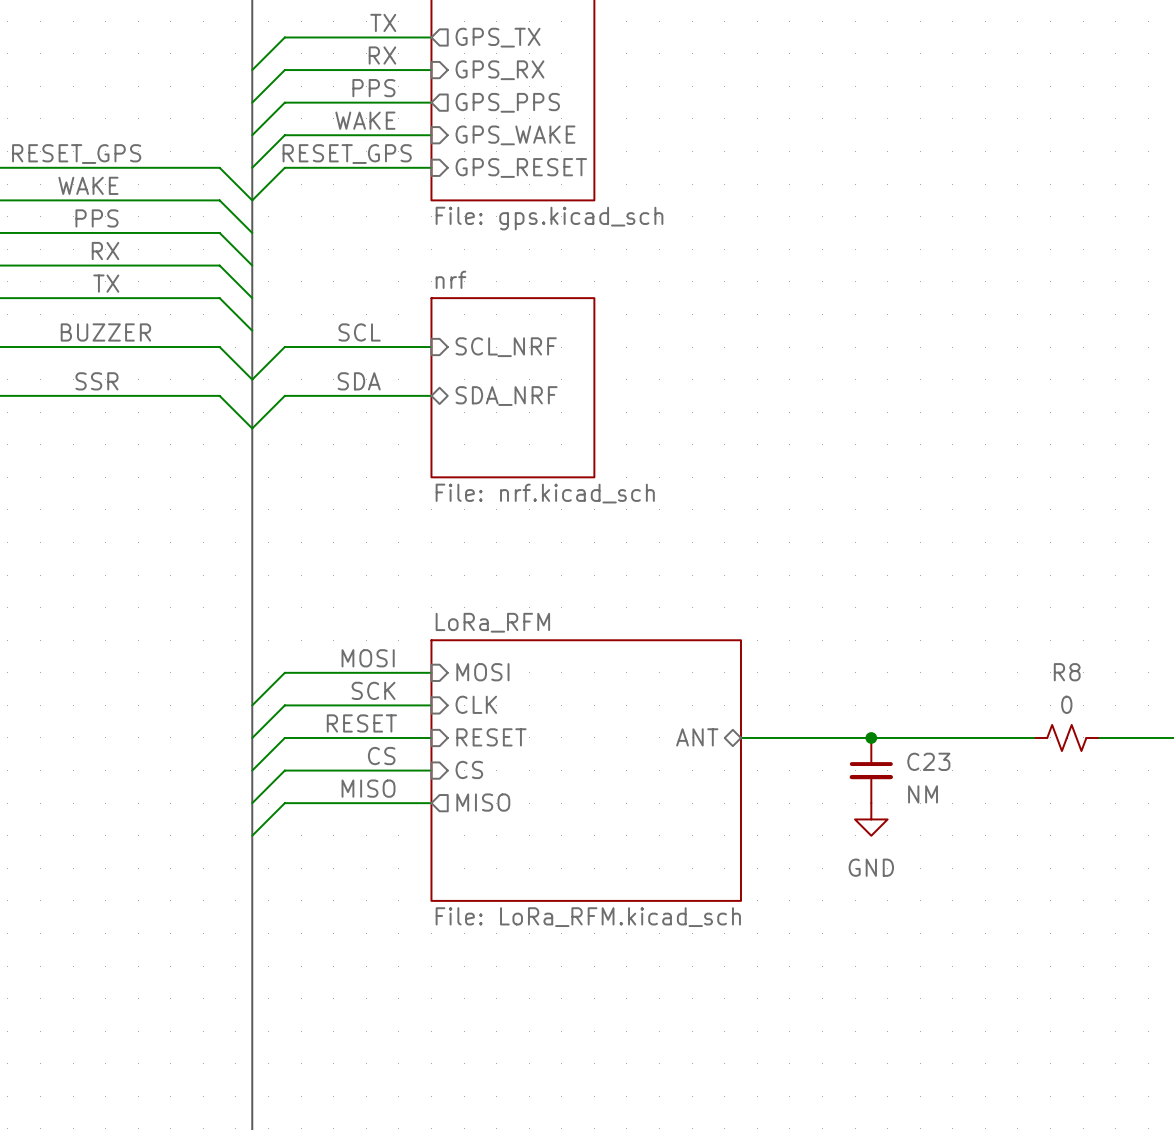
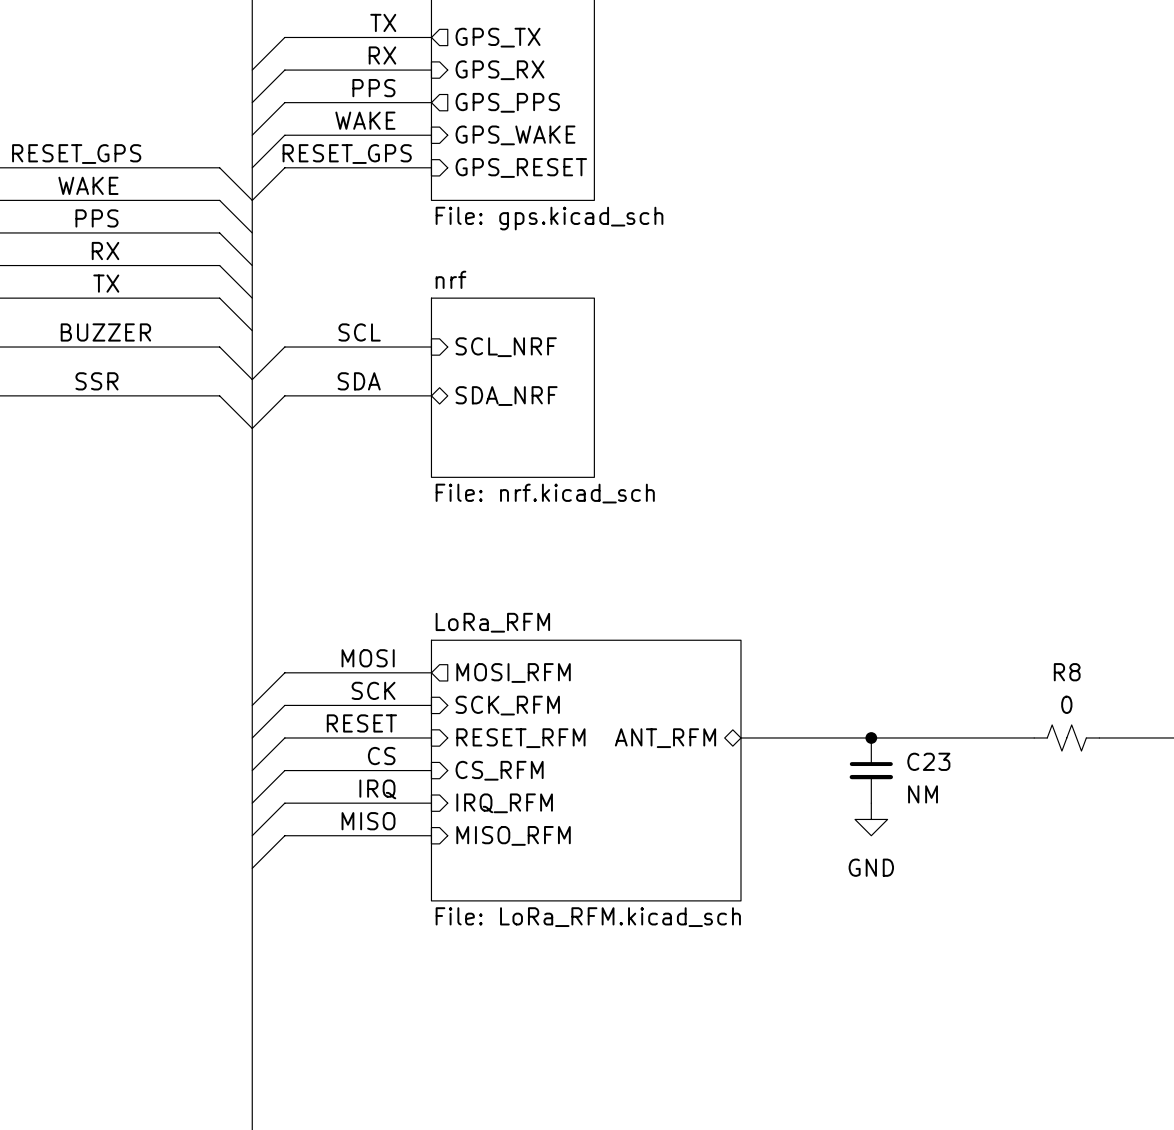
sheet pin shape: input (482, 672) -> output (513, 672)
sheet pin: MOSI (482, 672) -> MOSI_RFM (513, 672)
sheet pin: CLK (476, 704) -> SCK_RFM (507, 705)
sheet pin: RESET (491, 737) -> RESET_RFM (520, 738)
sheet pin: ANT (697, 737) -> ANT_RFM (665, 738)
sheet pin: CS (469, 769) -> CS_RFM (499, 770)
label: MISO (368, 788) -> IRQ (377, 789)
sheet pin shape: output (483, 802) -> input (504, 803)
sheet pin: MISO (483, 802) -> IRQ_RFM (504, 803)
label: none -> MISO (368, 821)
wire: none -> (431, 835) (284, 835) (252, 868)
sheet pin: none -> MISO_RFM (513, 835)

